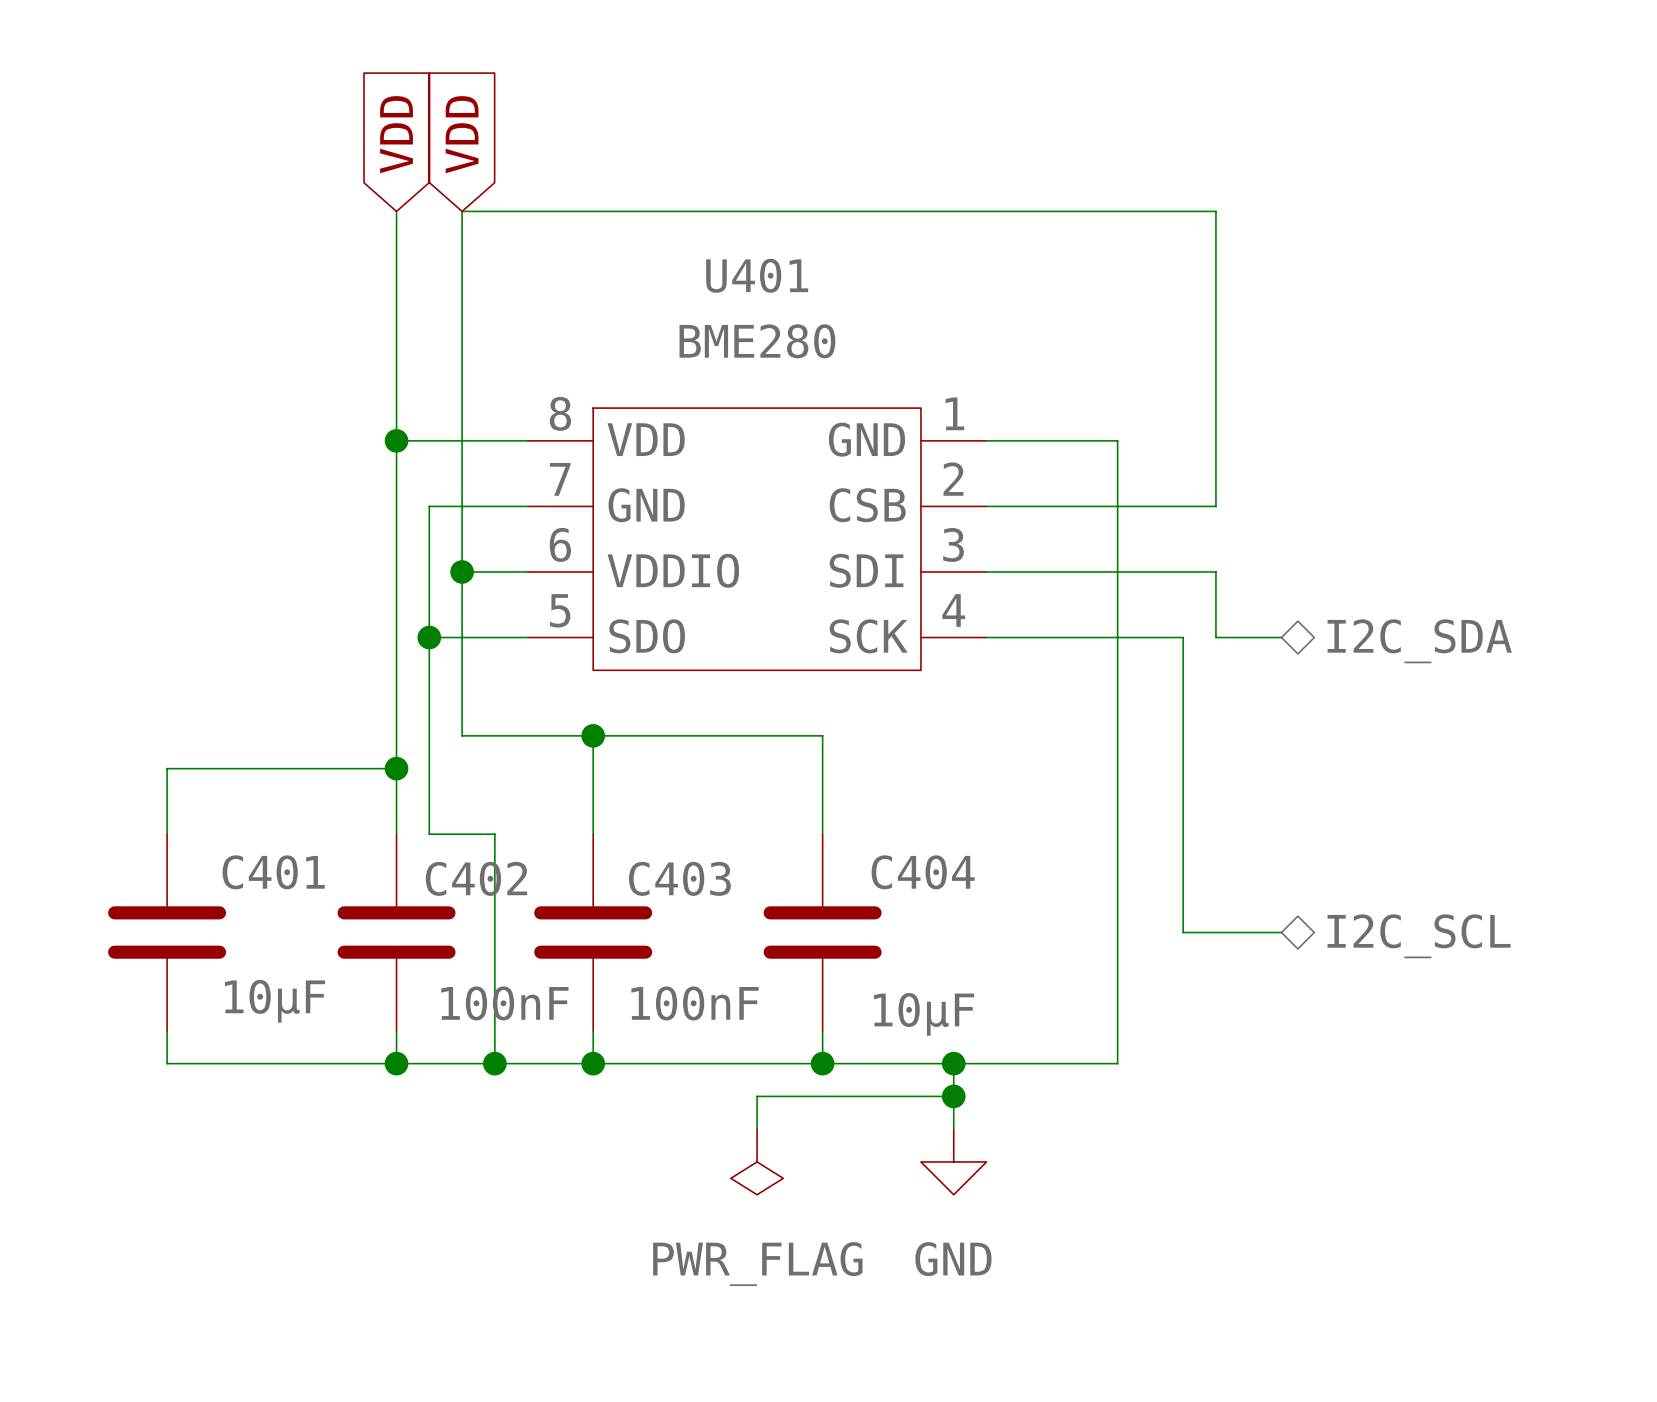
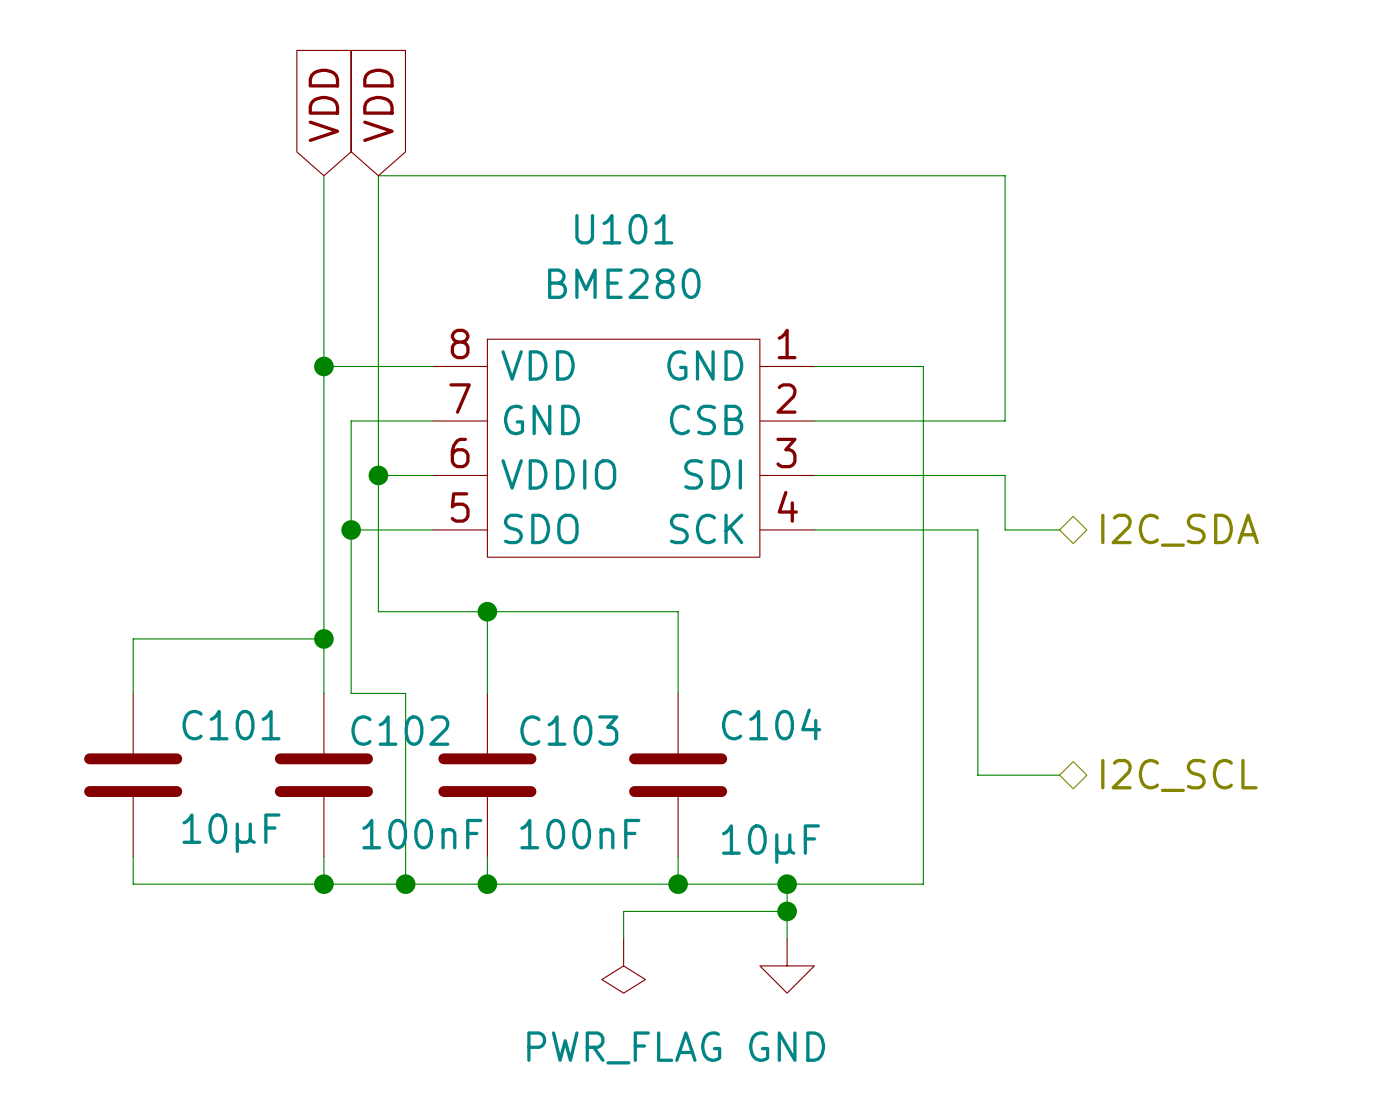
U401 name: U401 (757, 275) -> U101 (624, 229)
C401 name: C401 (273, 872) -> C101 (231, 725)
C404 name: C404 (923, 872) -> C104 (771, 724)
C402 name: C402 (476, 878) -> C102 (400, 730)
C403 name: C403 (679, 878) -> C103 (569, 730)

